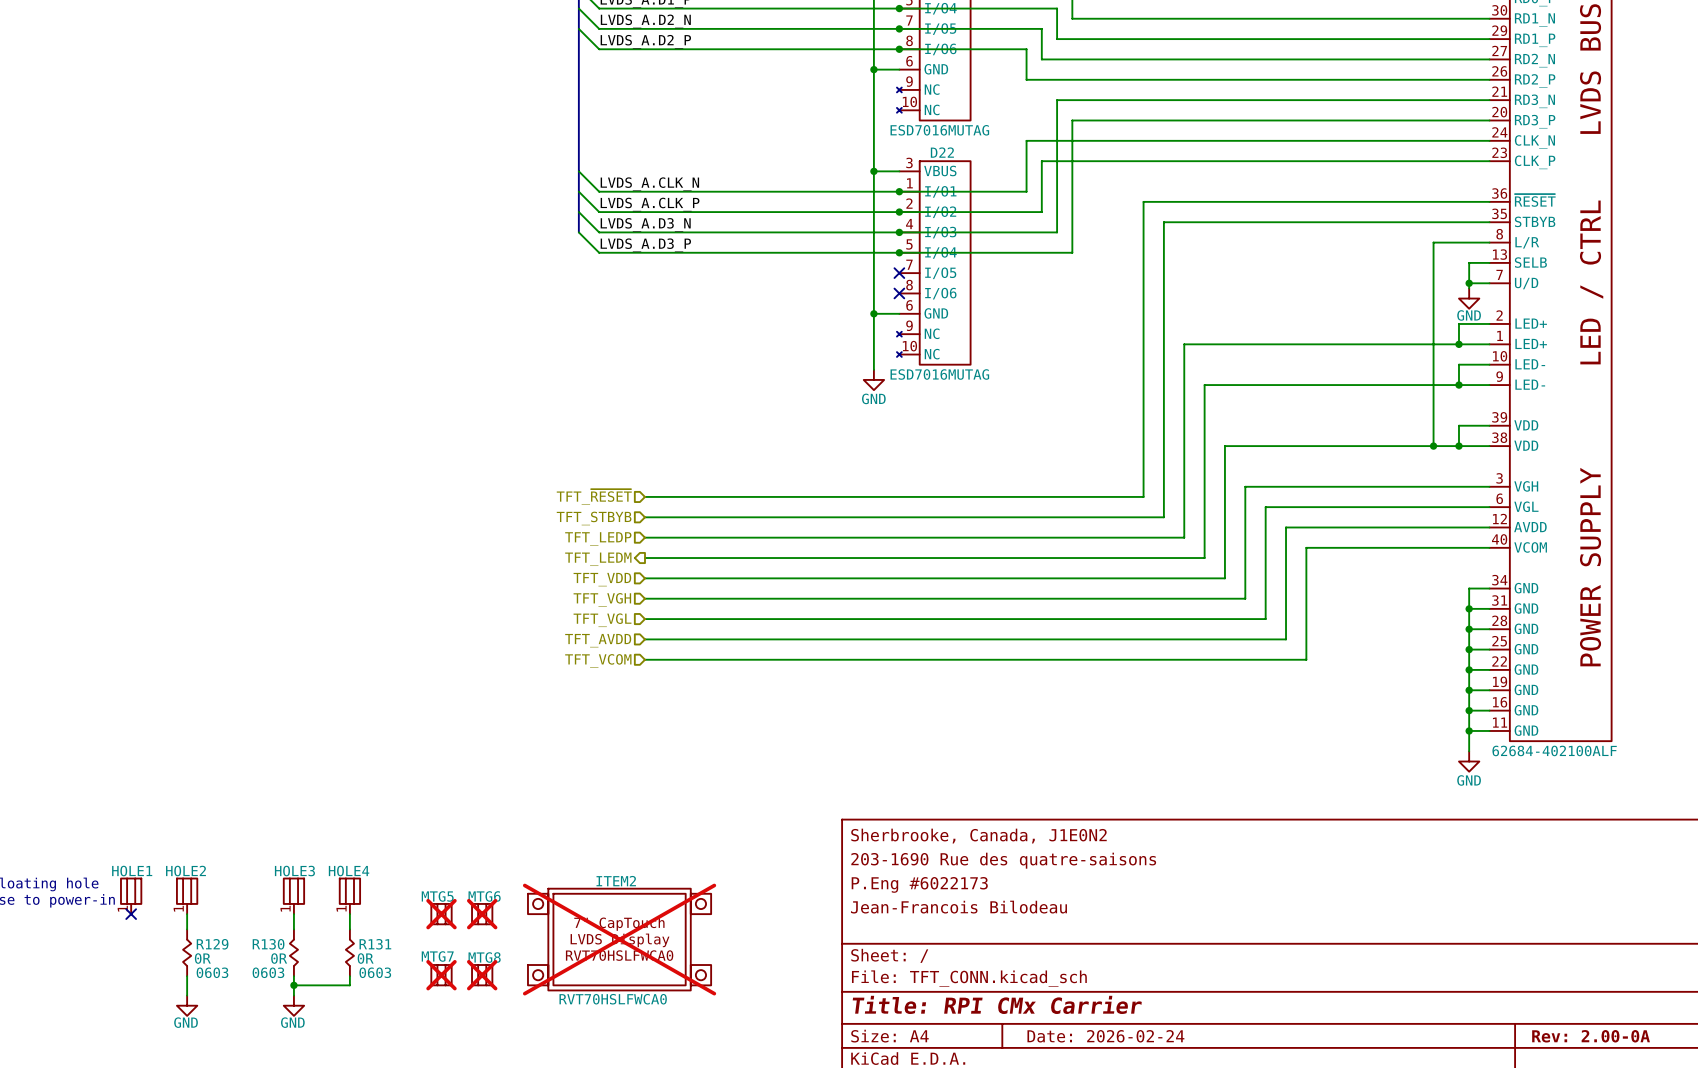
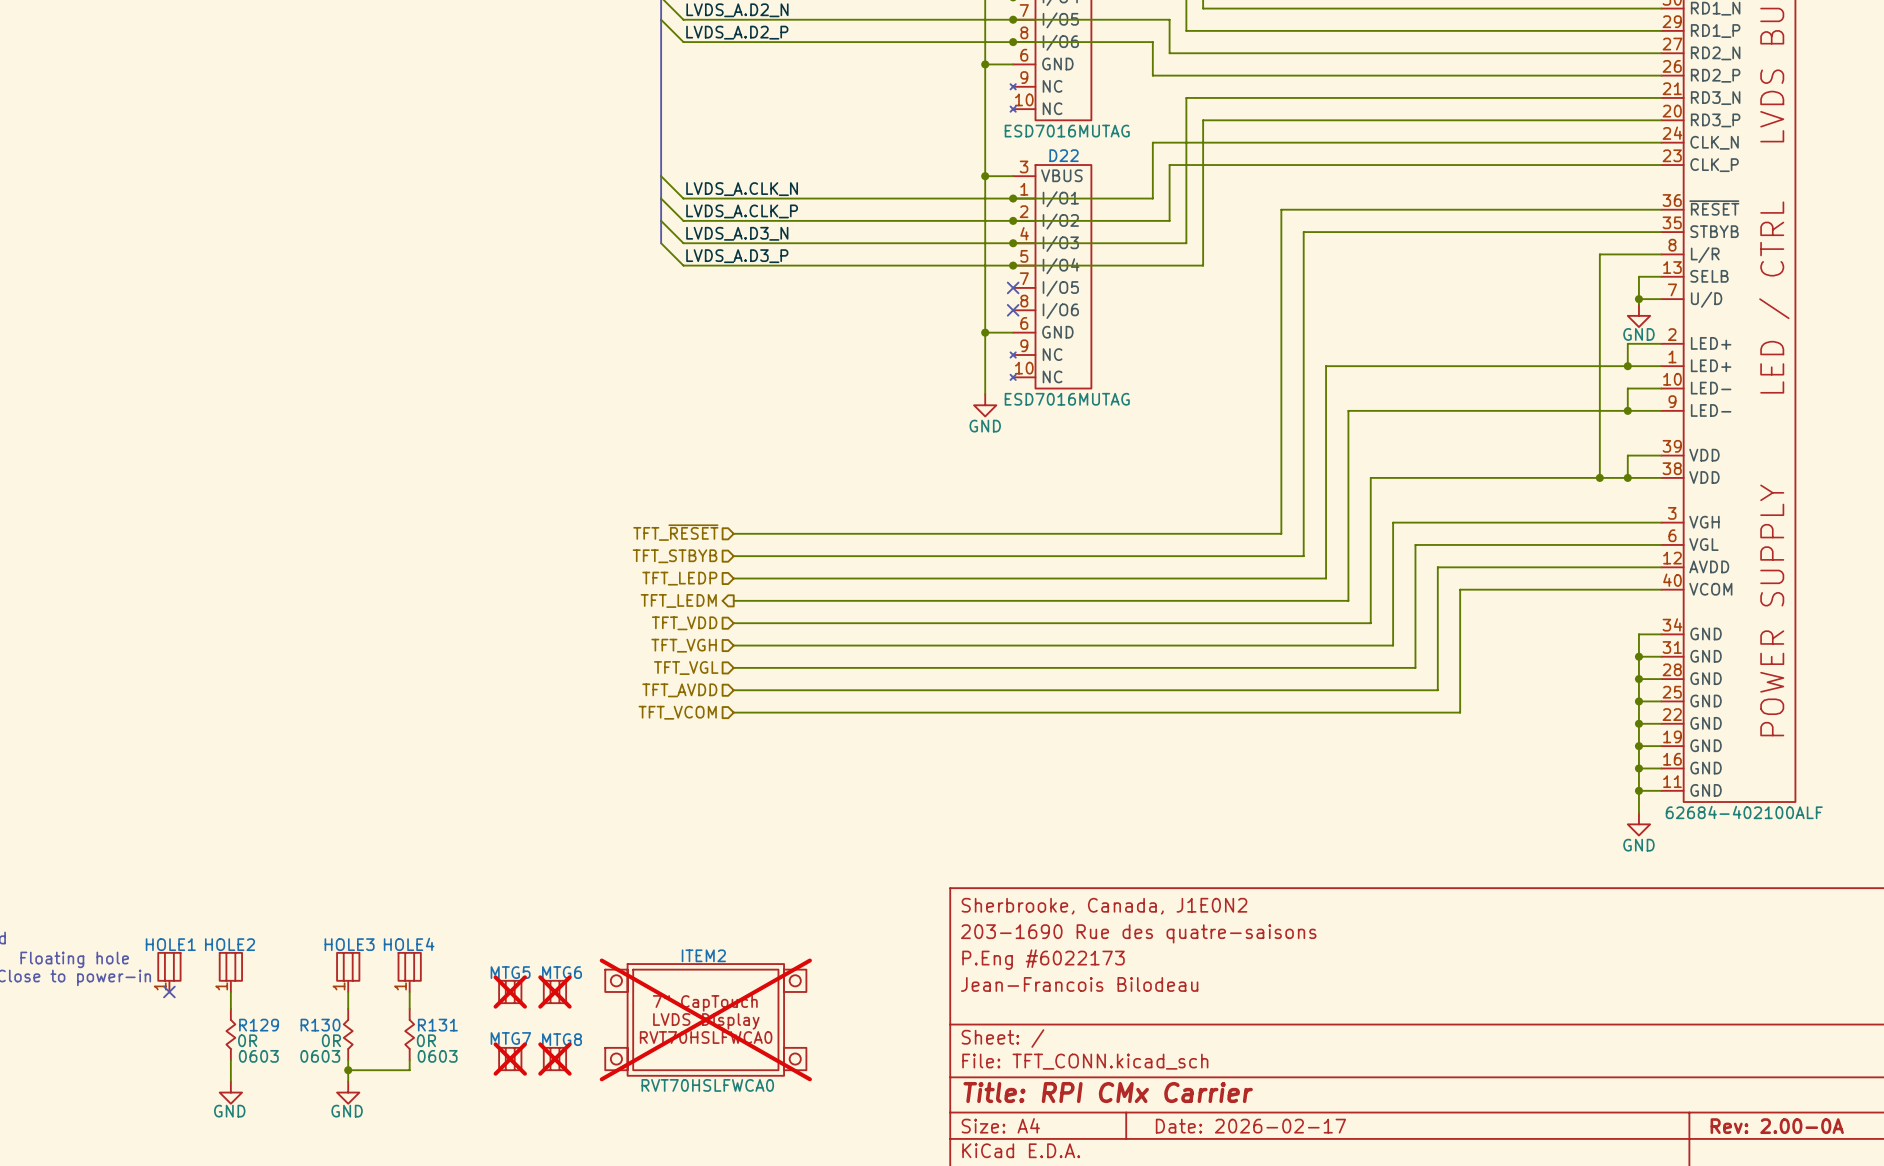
title block: Date: 2026-02-24 (1105, 1036) -> Date: 2026-02-17 (1250, 1126)

